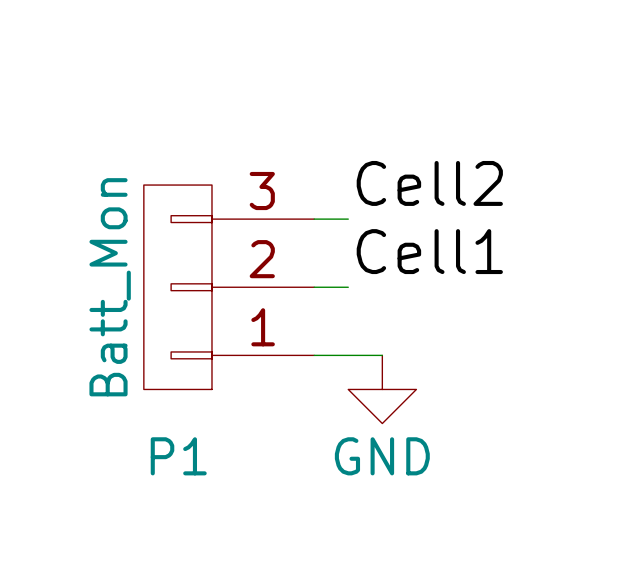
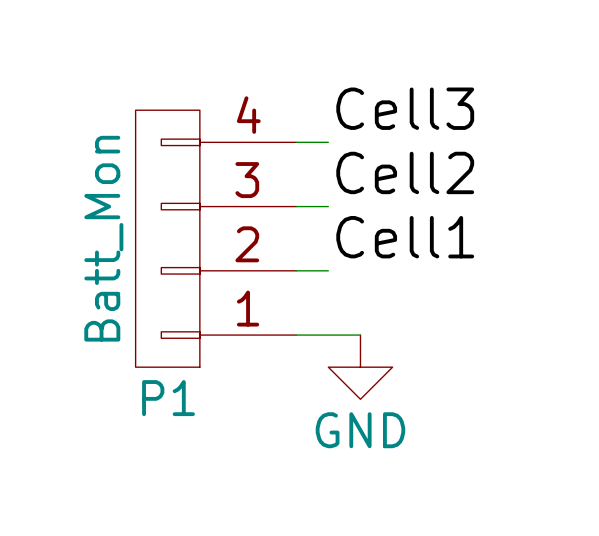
label: none -> Cell3 (405, 108)
wire: none -> (296, 142) (328, 142)
P1 symbol: [143, 185, 315, 390] -> [135, 110, 297, 368]

